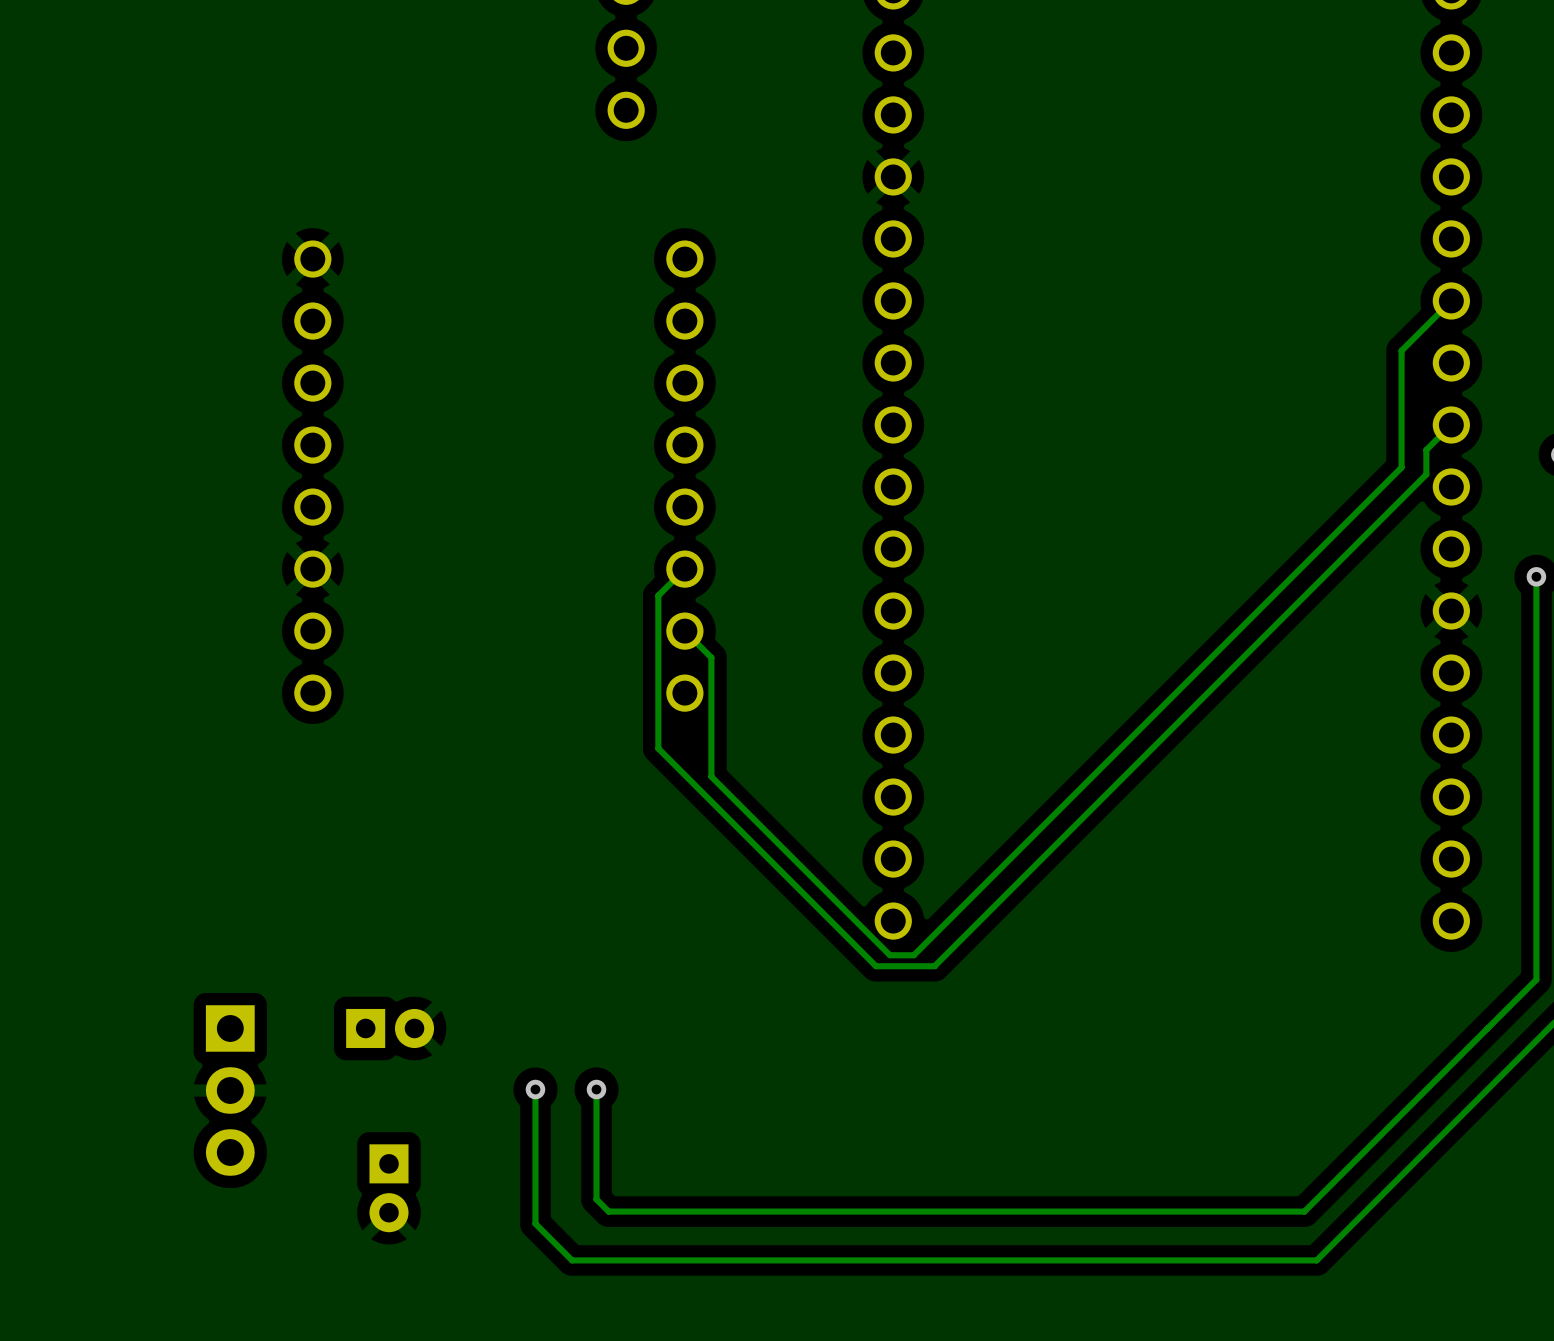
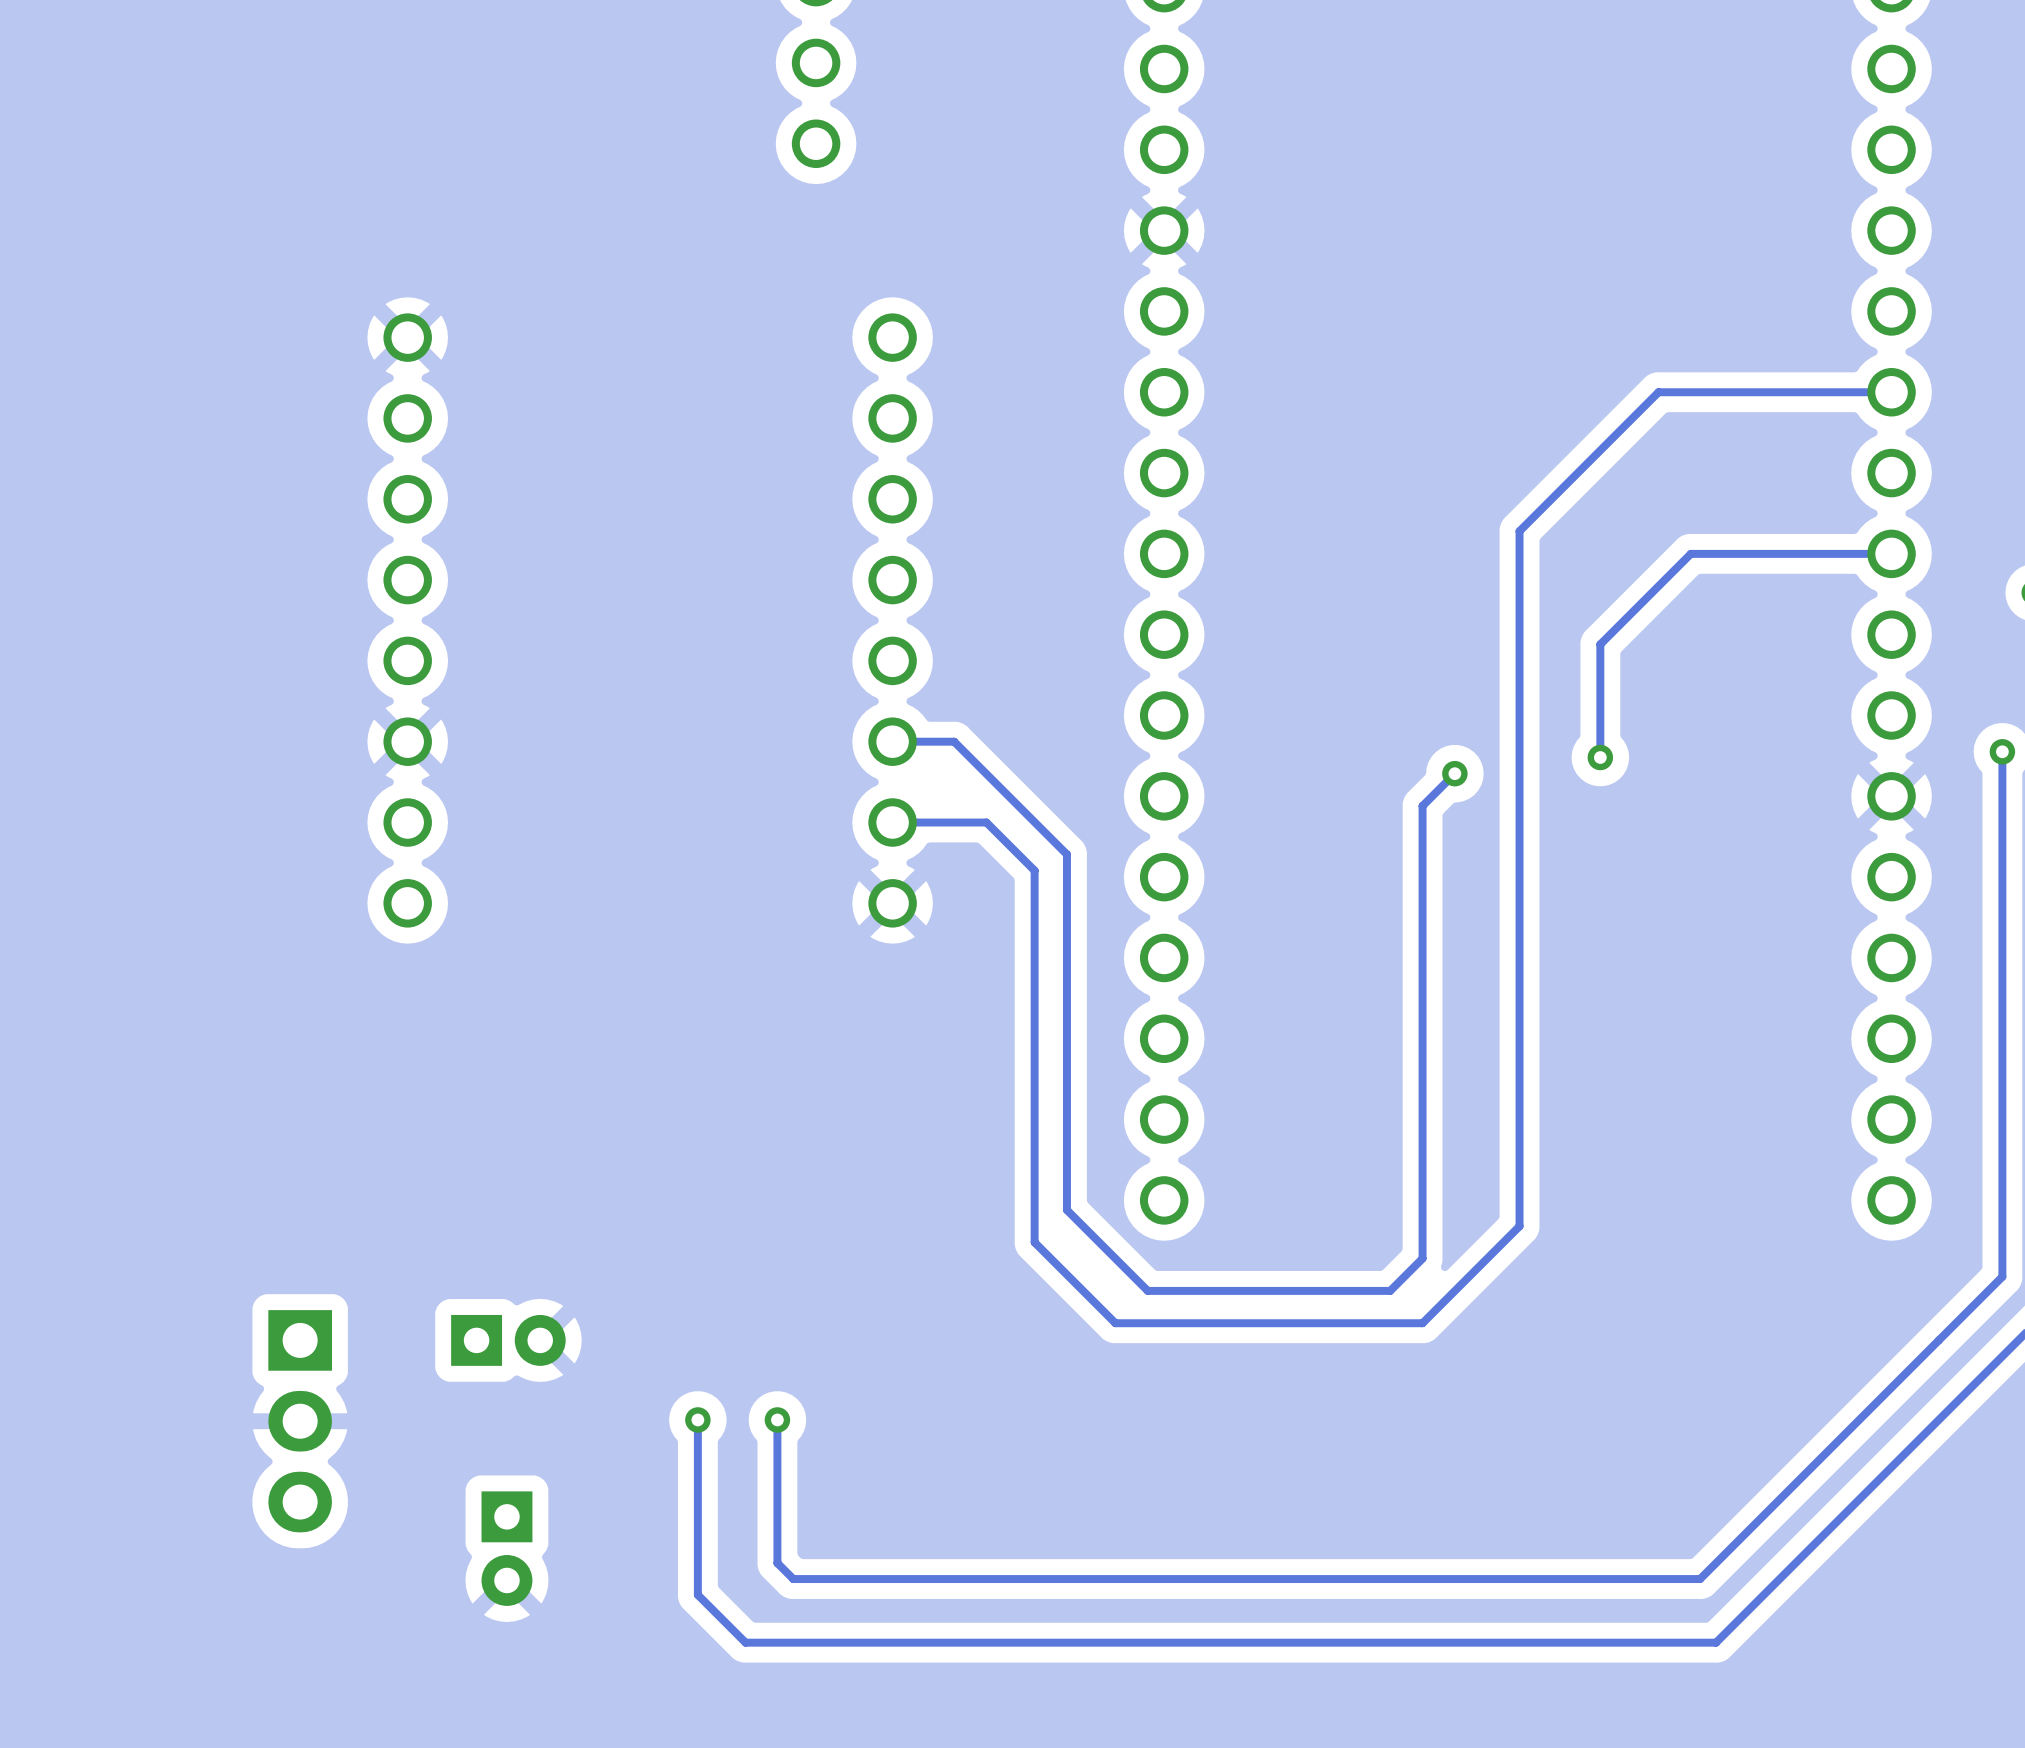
track: (1451, 300) (1401, 350) (1401, 467) (913, 955) (889, 955) (711, 776) (711, 657) (684, 631) -> (1891, 392) (1658, 392) (1519, 531) (1519, 1226) (1422, 1323) (1115, 1323) (1034, 1242) (1034, 870) (986, 822) (892, 822)
track: (1451, 424) (1426, 449) (1426, 474) (934, 966) (876, 966) (658, 748) (658, 595) (684, 569) -> (1454, 773) (1422, 806) (1422, 1258) (1390, 1290) (1147, 1290) (1066, 1210) (1066, 854) (954, 741) (892, 741)
track: none -> (1891, 553) (1690, 553) (1600, 644) (1600, 757)
via: none -> (1600, 757)
via: none -> (1454, 773)

